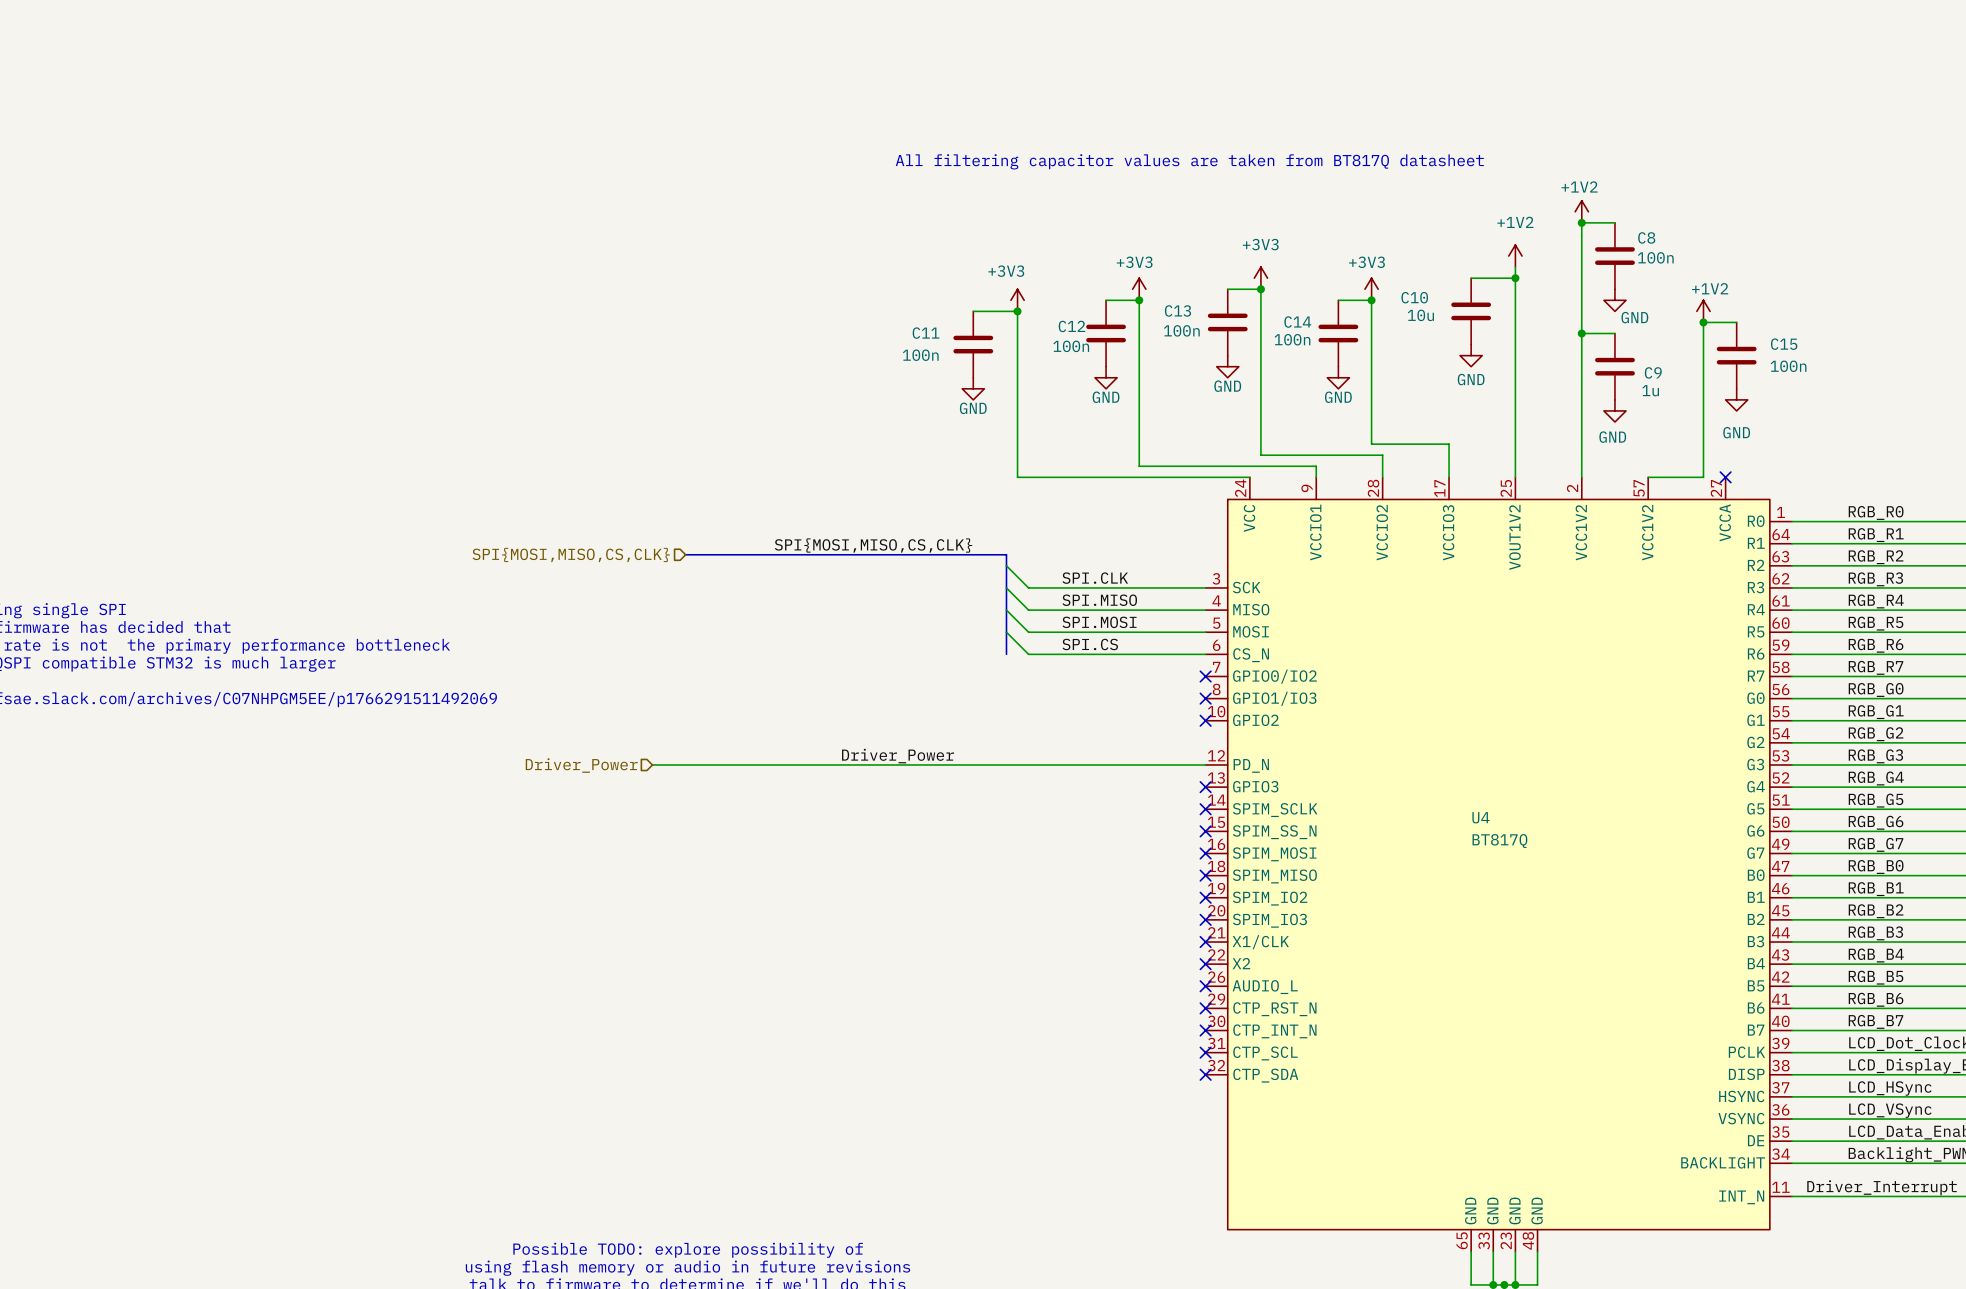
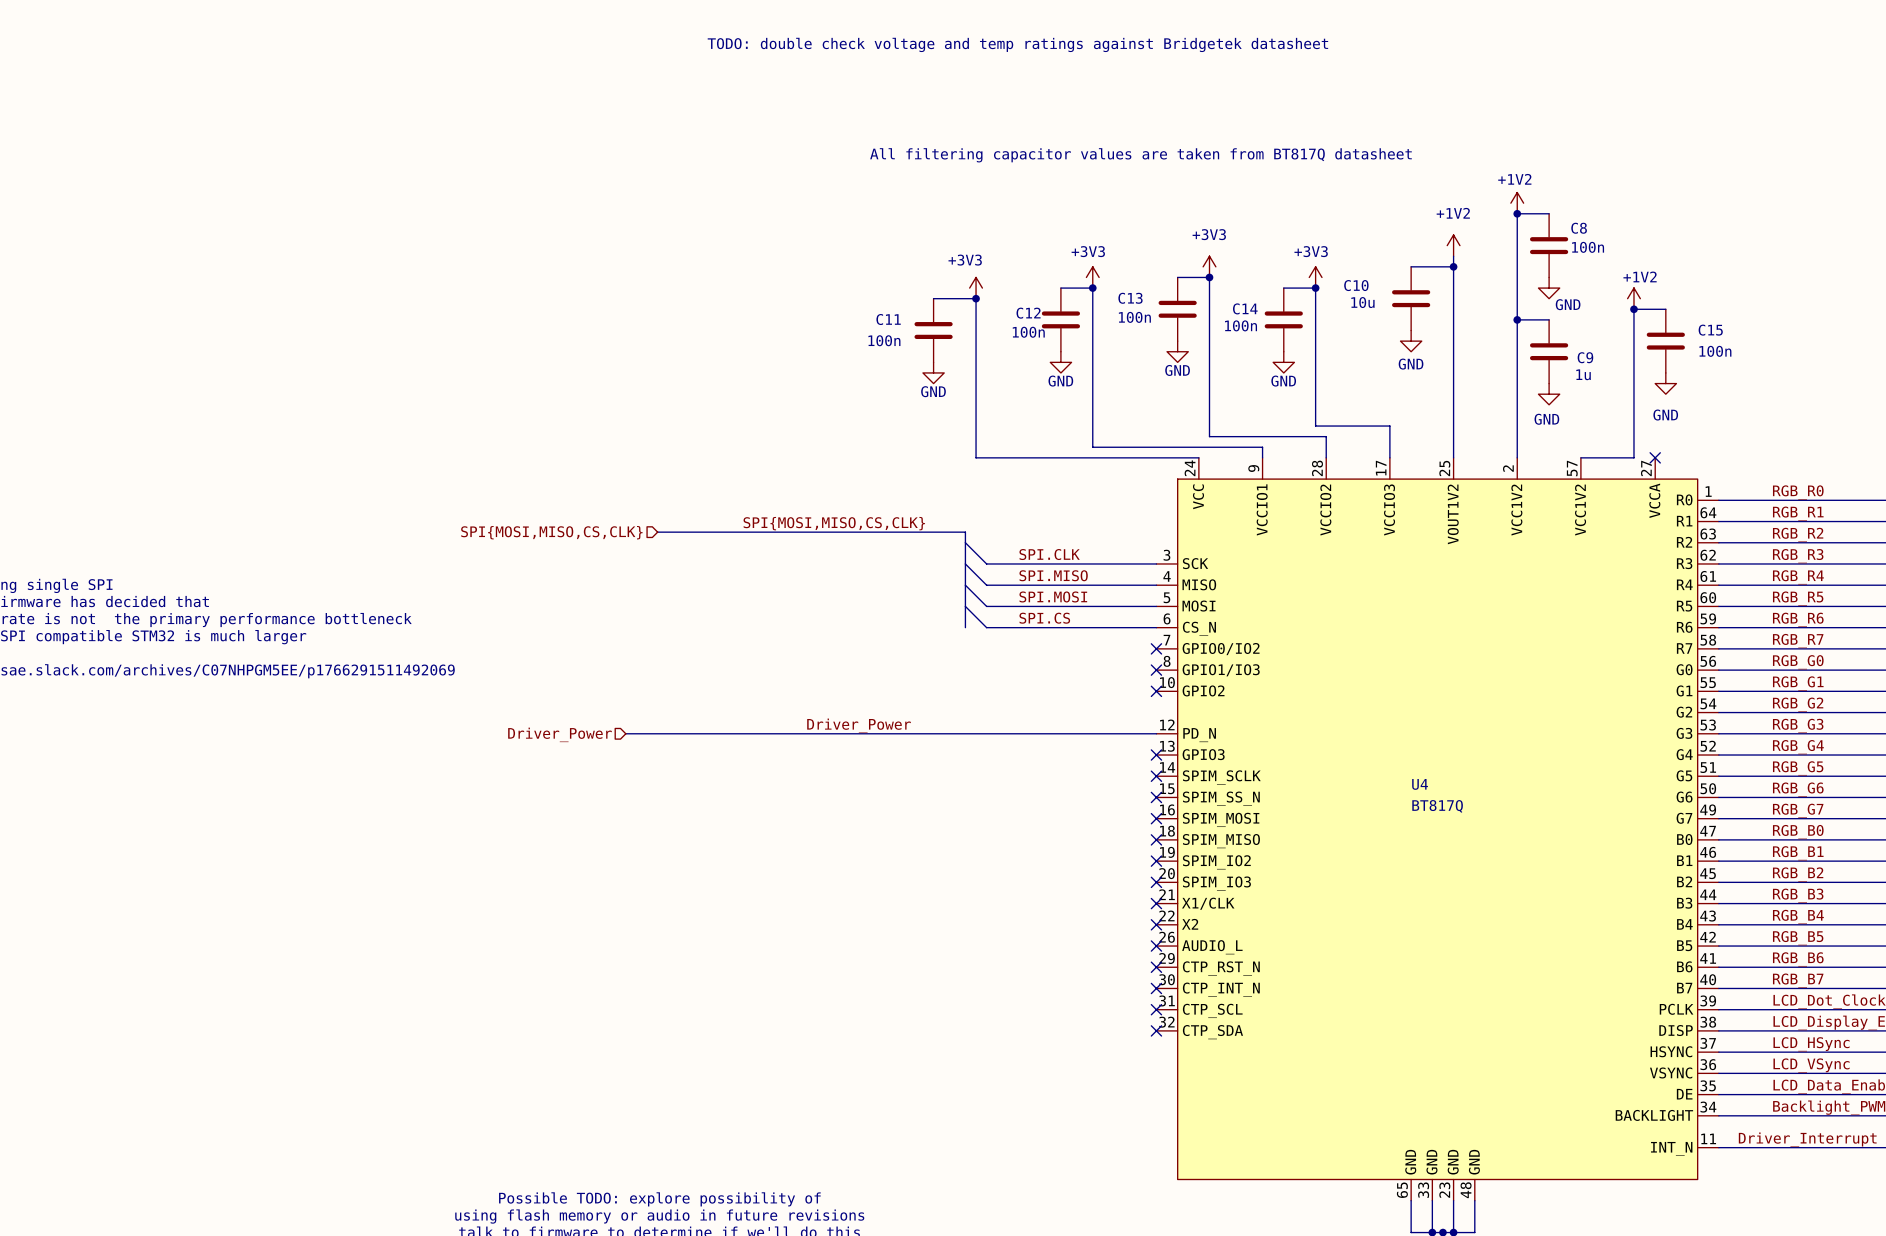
text: none -> TODO: double check voltage and temp ratings against Bridgetek datasheet (1017, 44)

